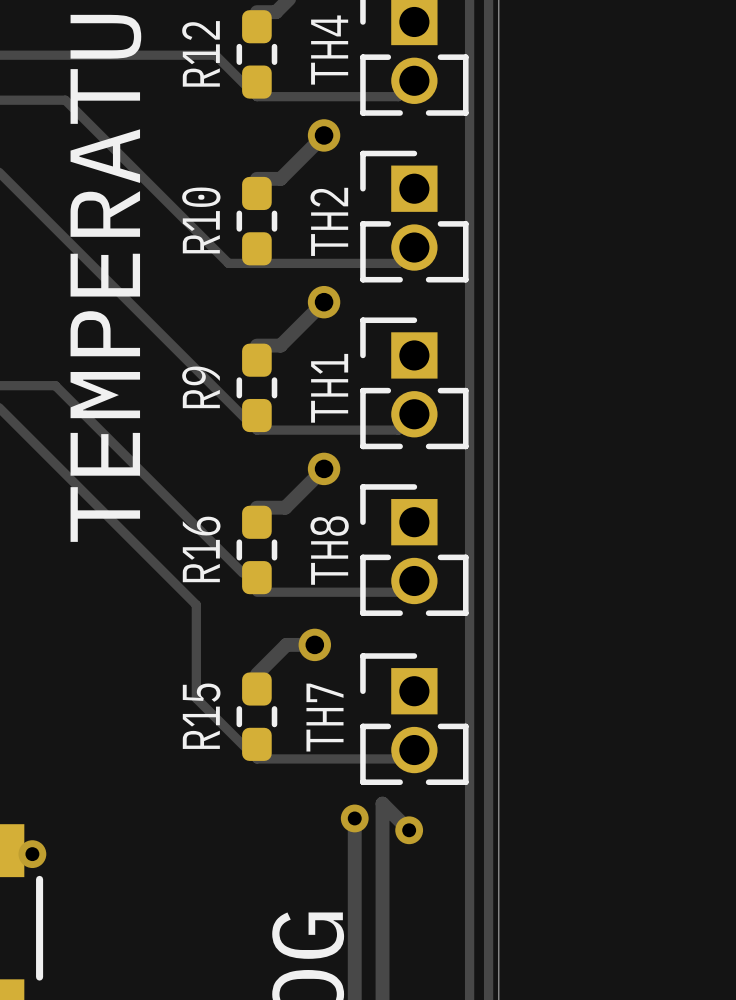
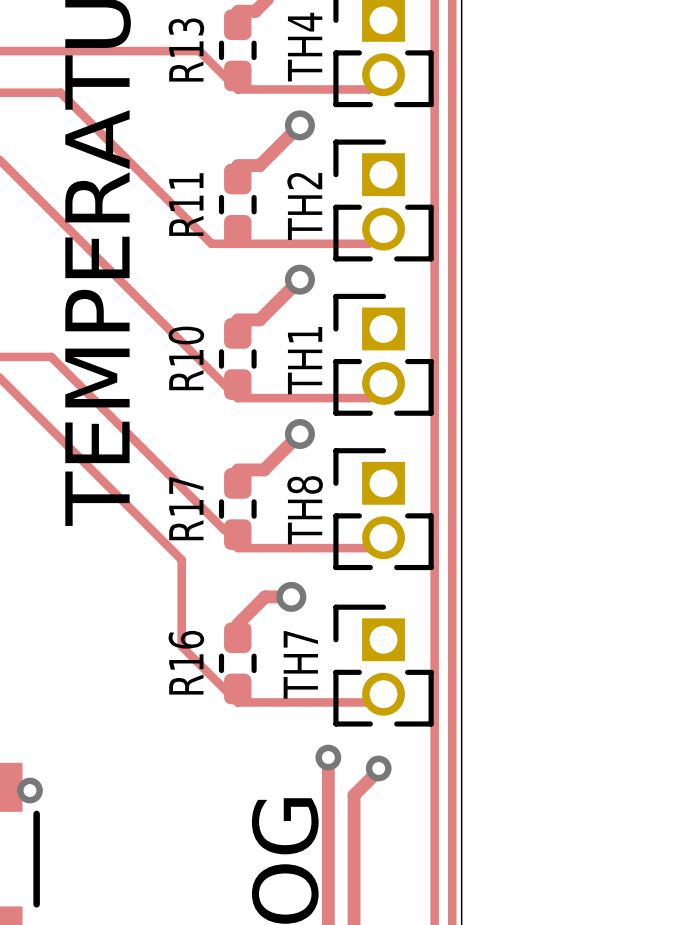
R12 name: R12 (201, 53) -> R13 (186, 50)
R10 name: R10 (201, 220) -> R11 (186, 204)
R9 name: R9 (201, 387) -> R10 (186, 358)
R16 name: R16 (201, 549) -> R17 (186, 508)
R15 name: R15 (201, 716) -> R16 (186, 662)
track: (409, 830) (382, 803) (382, 859) -> (378, 768) (354, 795)

